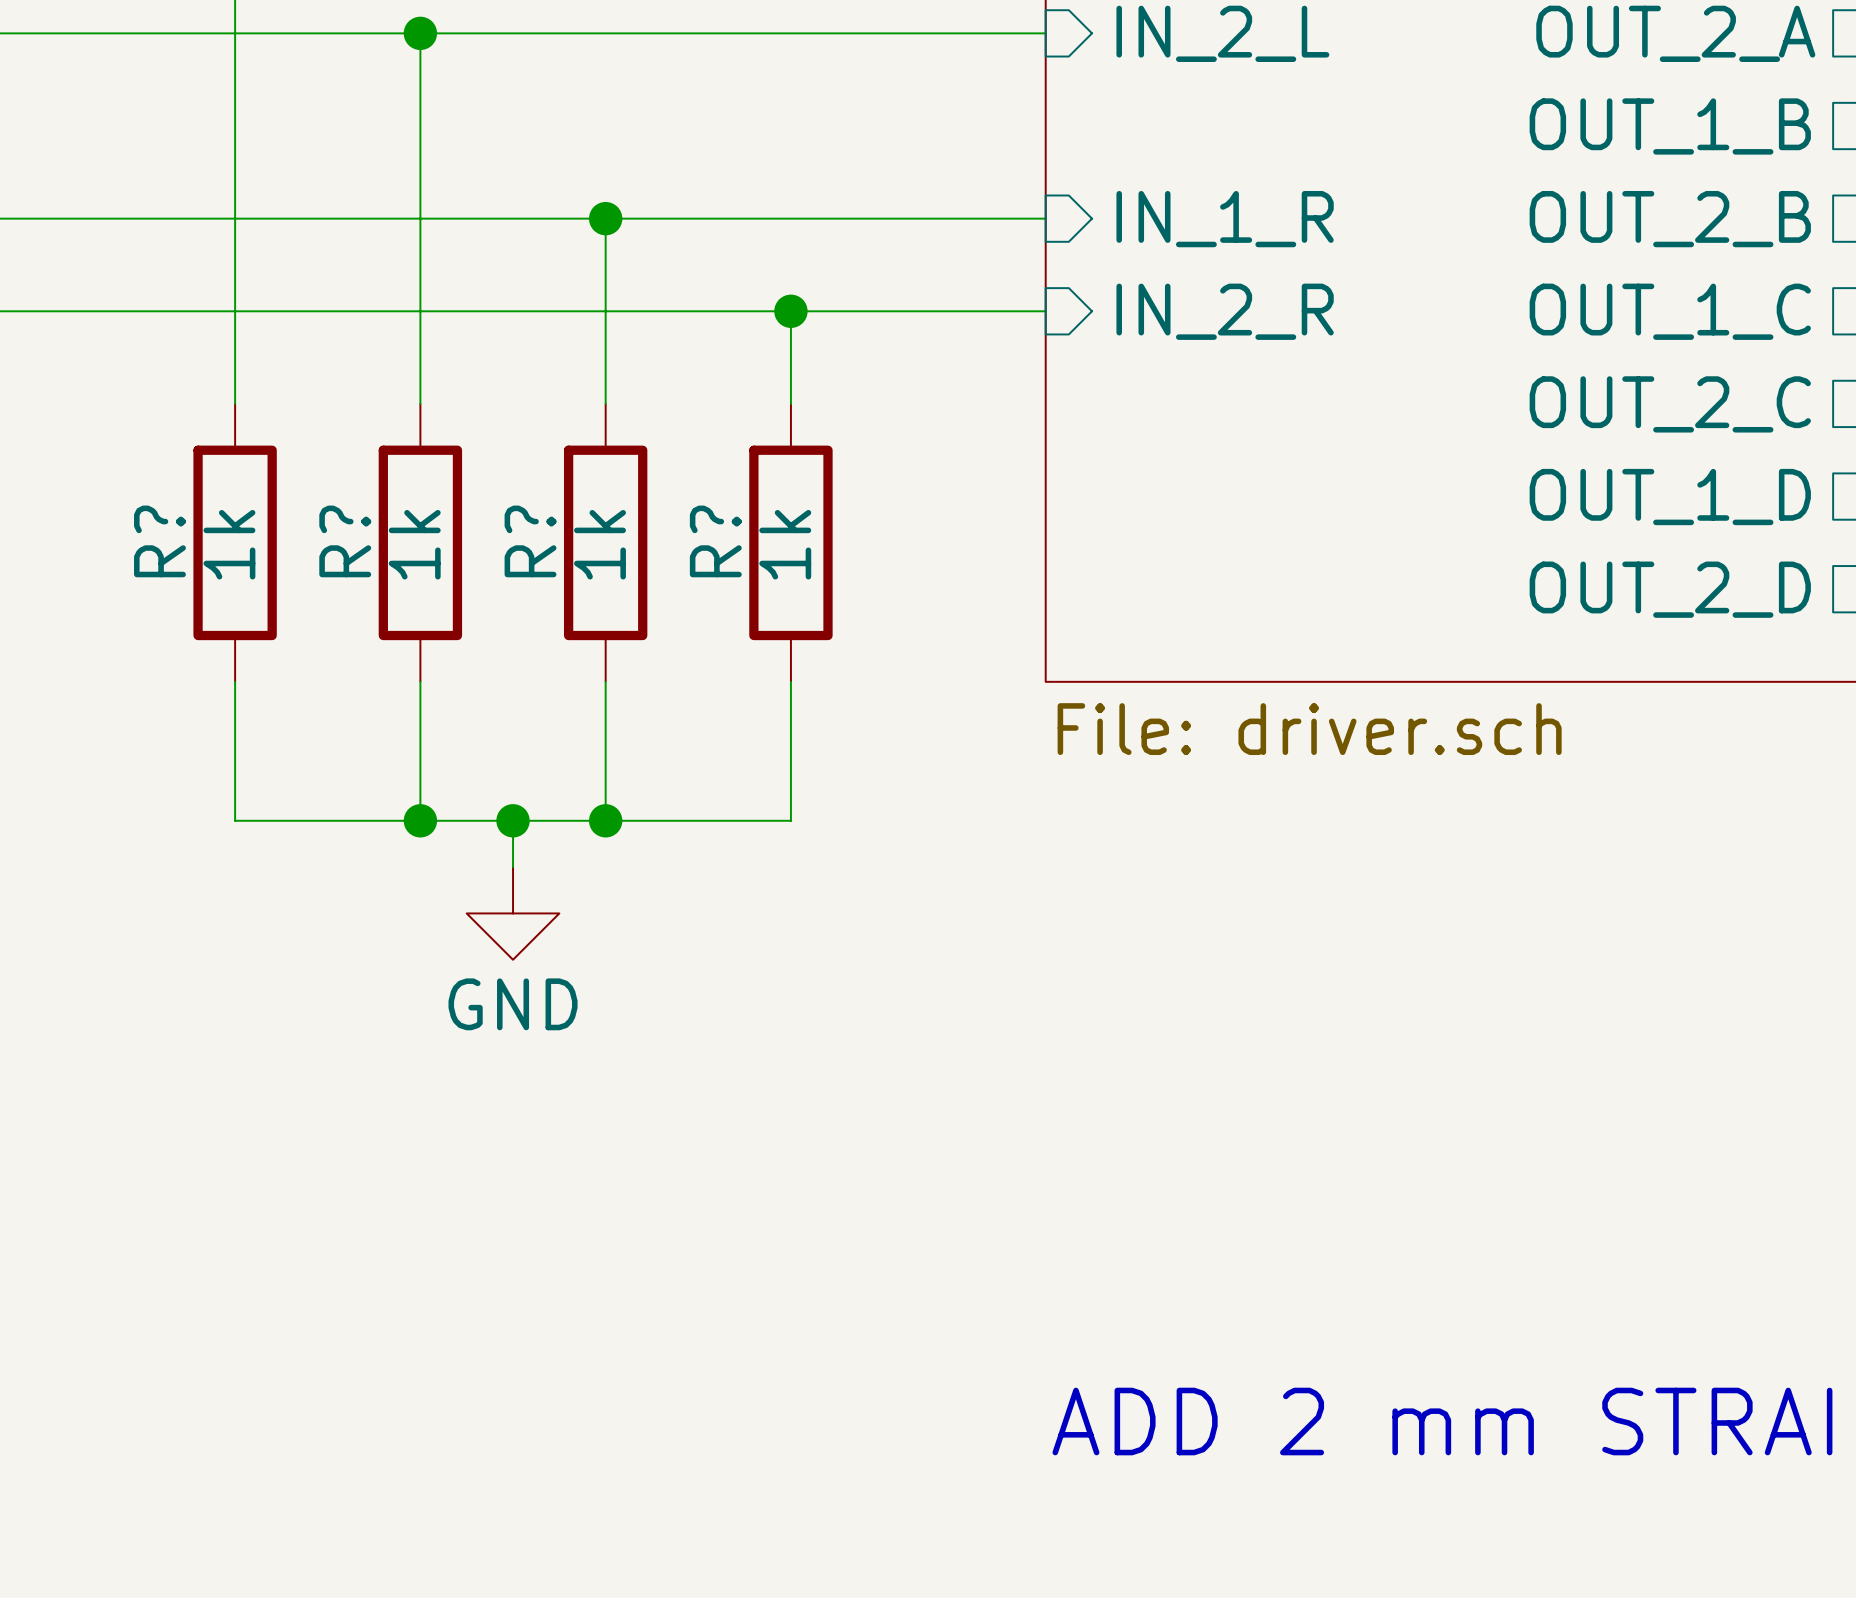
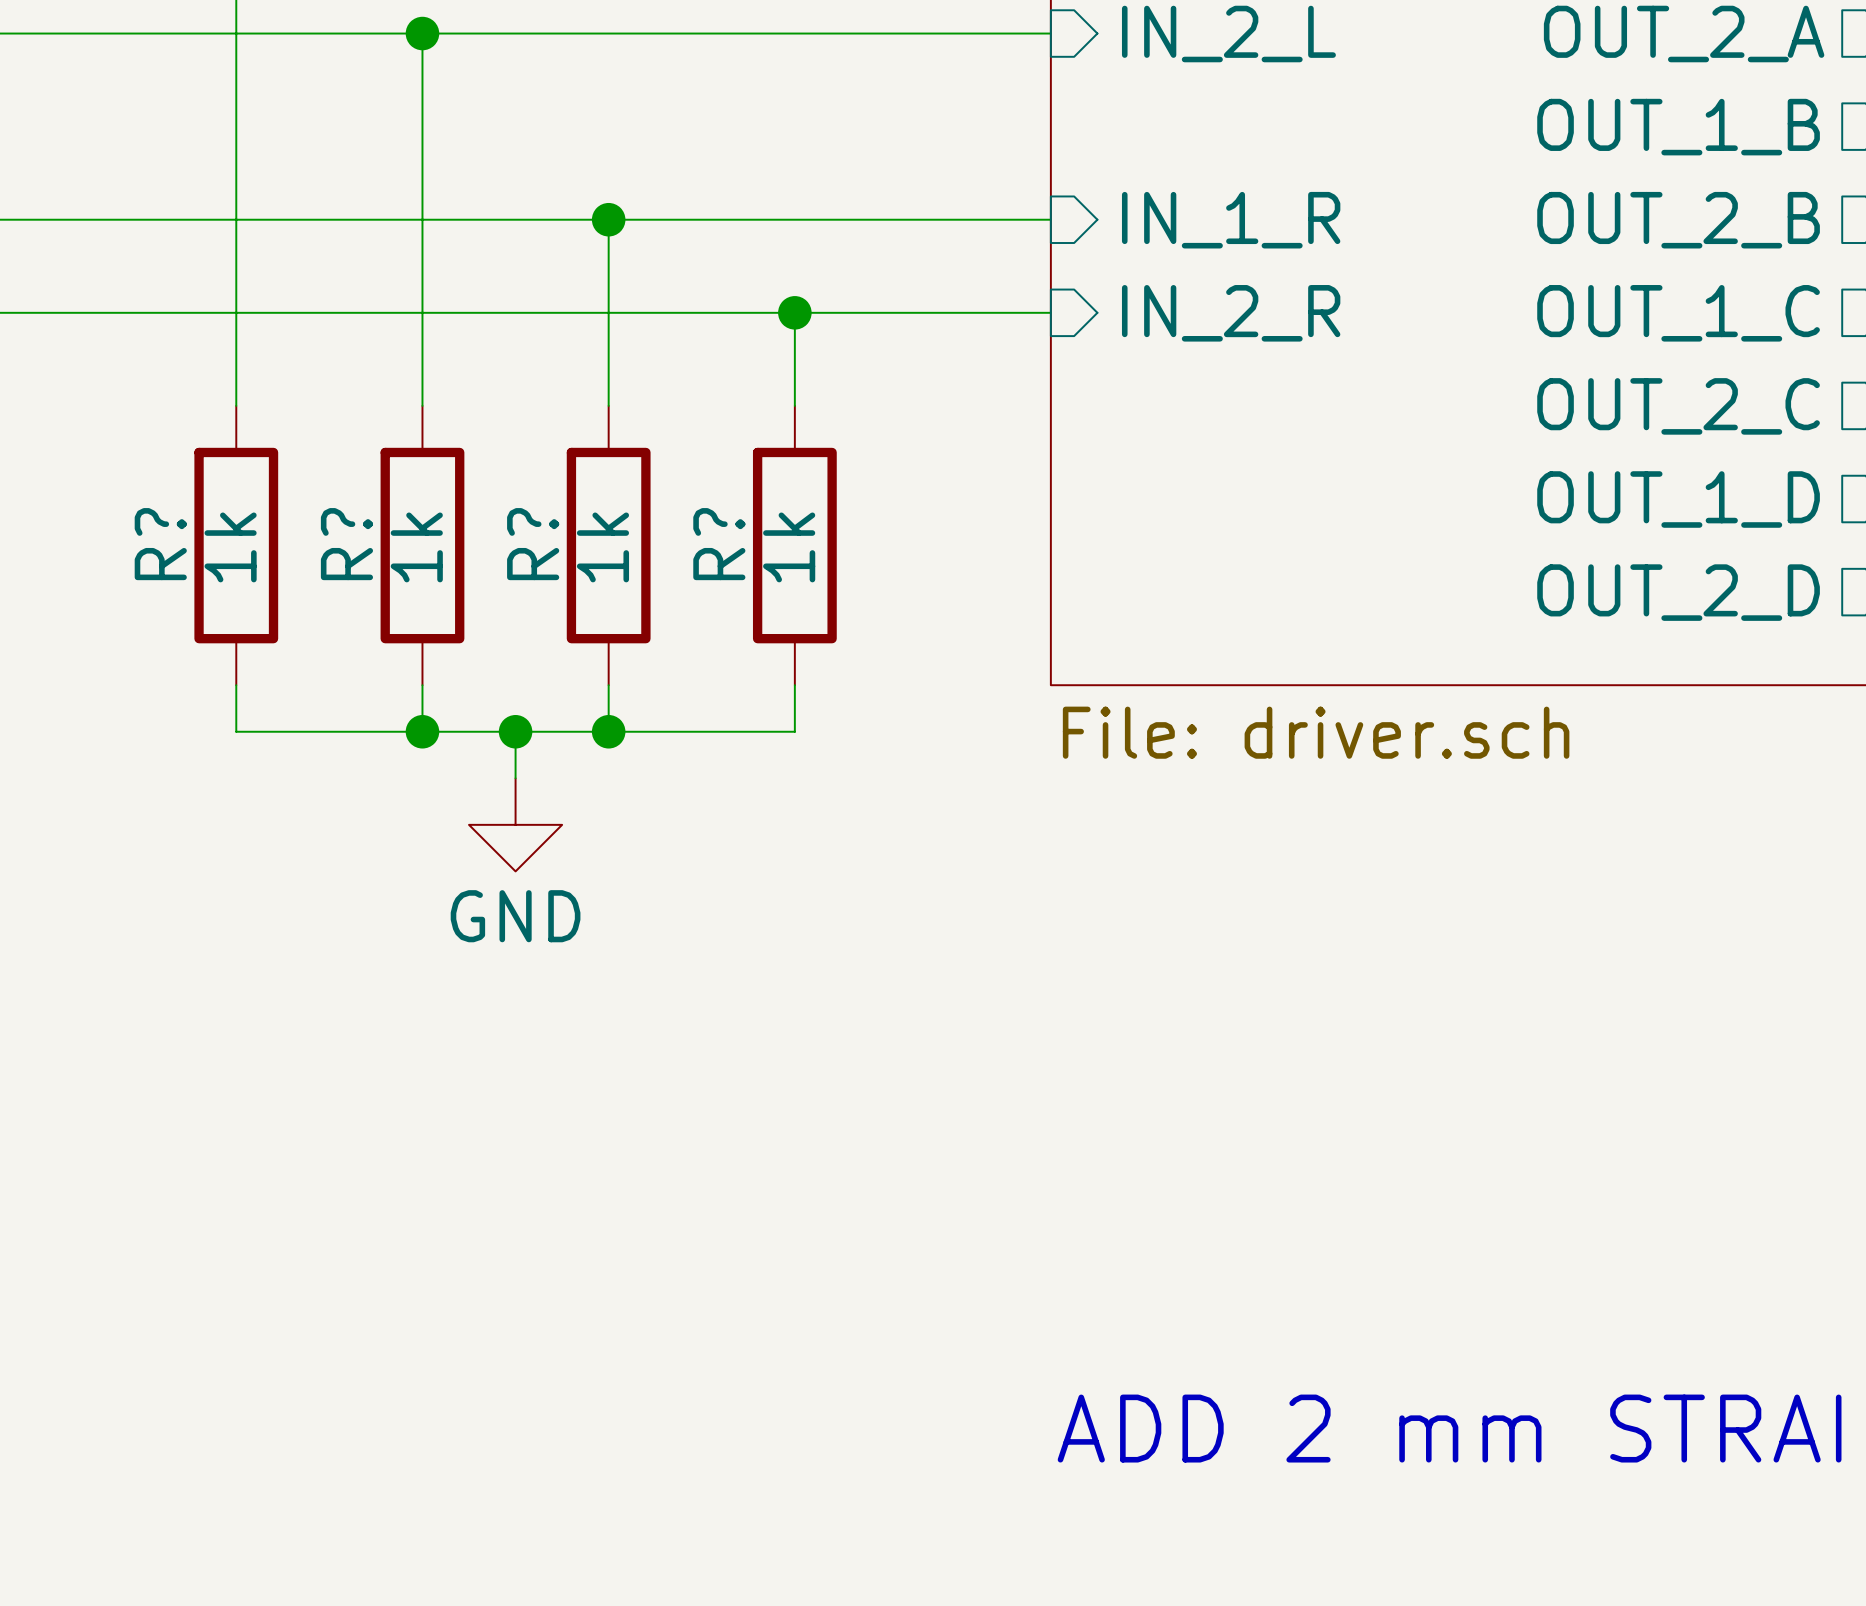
wire: (235, 728) (235, 820) (790, 820) (790, 728) -> (236, 731) (794, 731)
wire: (420, 728) (420, 820) -> none
junction: none -> (422, 731)
junction: none -> (515, 731)
wire: (605, 728) (605, 820) -> none
junction: none -> (608, 731)
junction: (420, 820) -> none
wire: (513, 820) (513, 867) -> (515, 731) (515, 778)
junction: (513, 820) -> none
junction: (605, 820) -> none
power symbol position: GND (513, 913) -> GND (515, 824)

